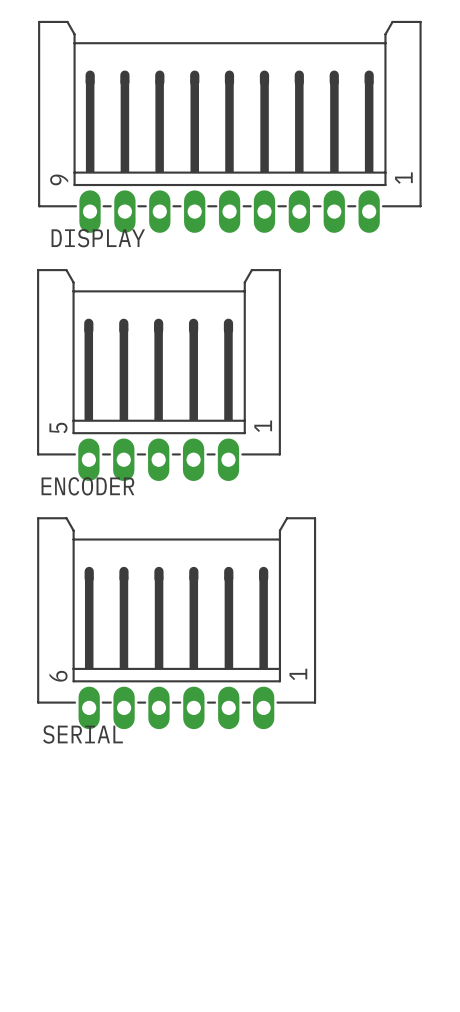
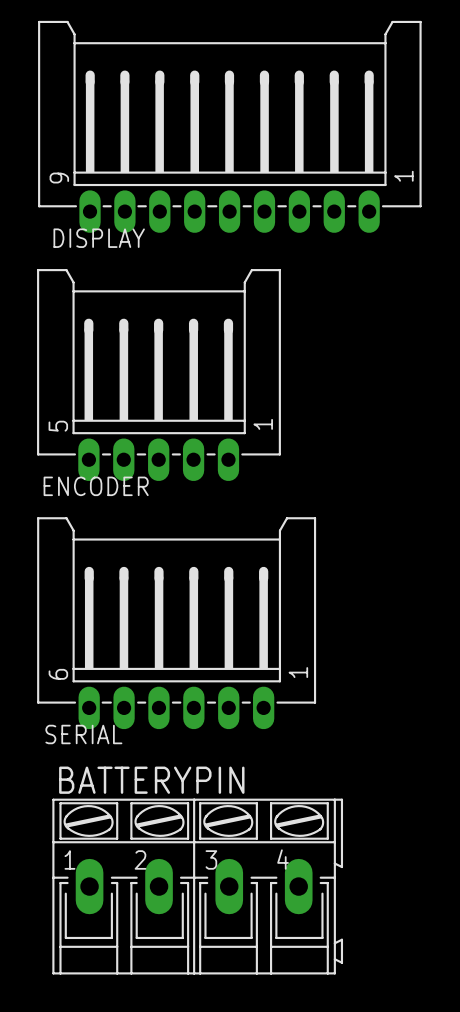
BATTERYPIN: none -> (197, 886)

